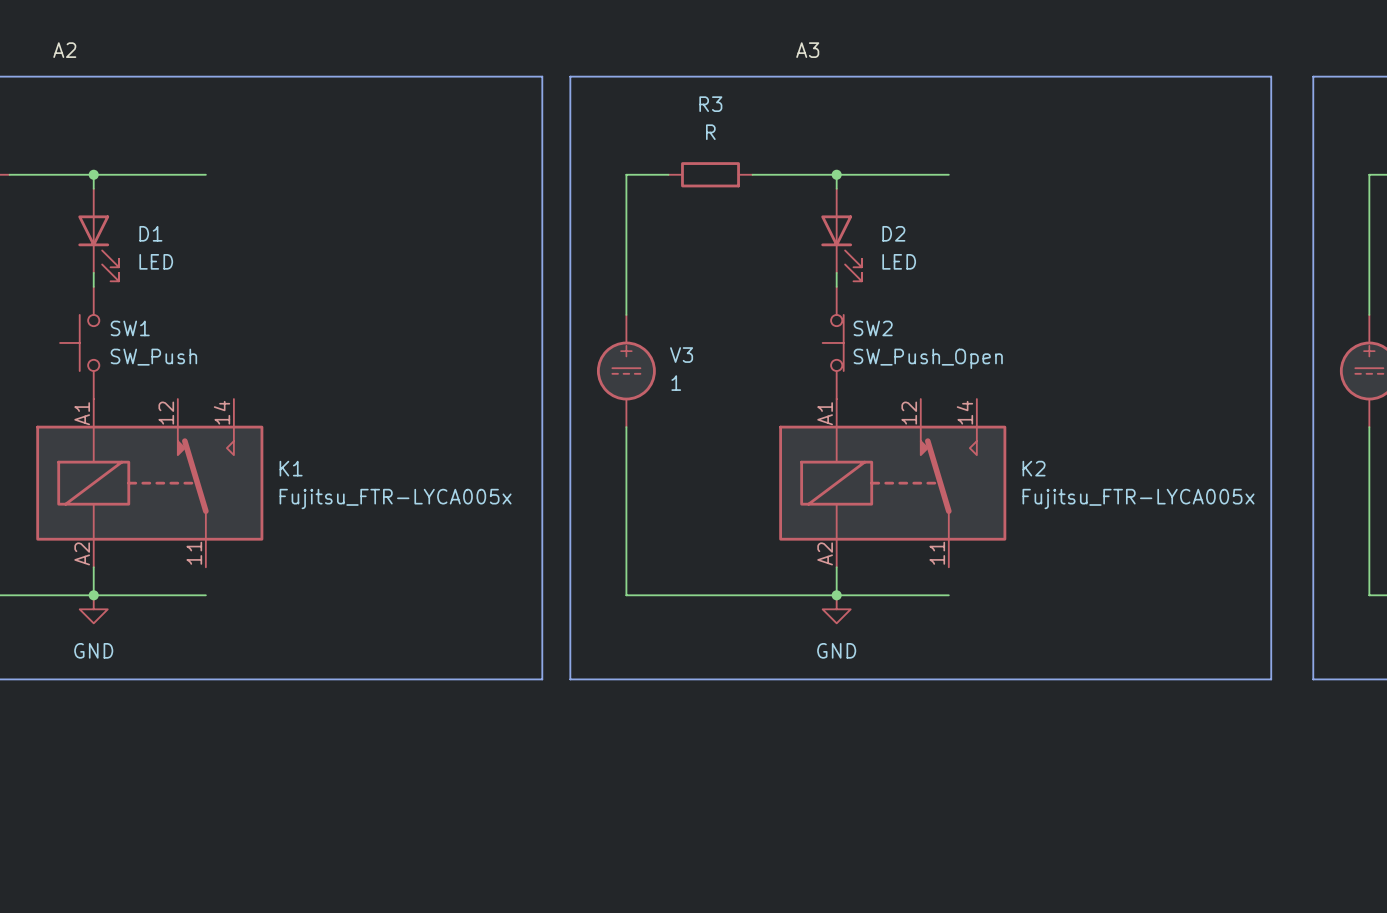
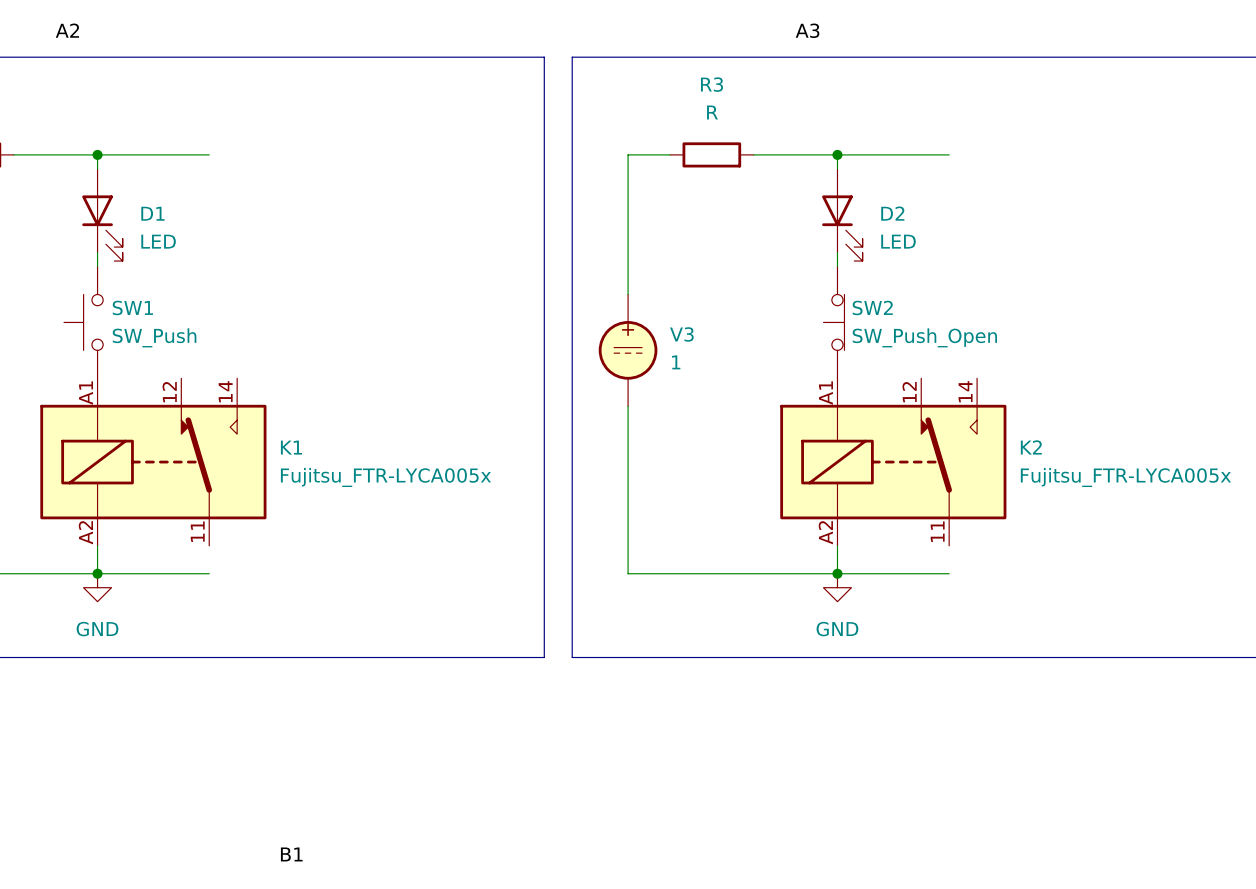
label: none -> B1 (291, 854)

